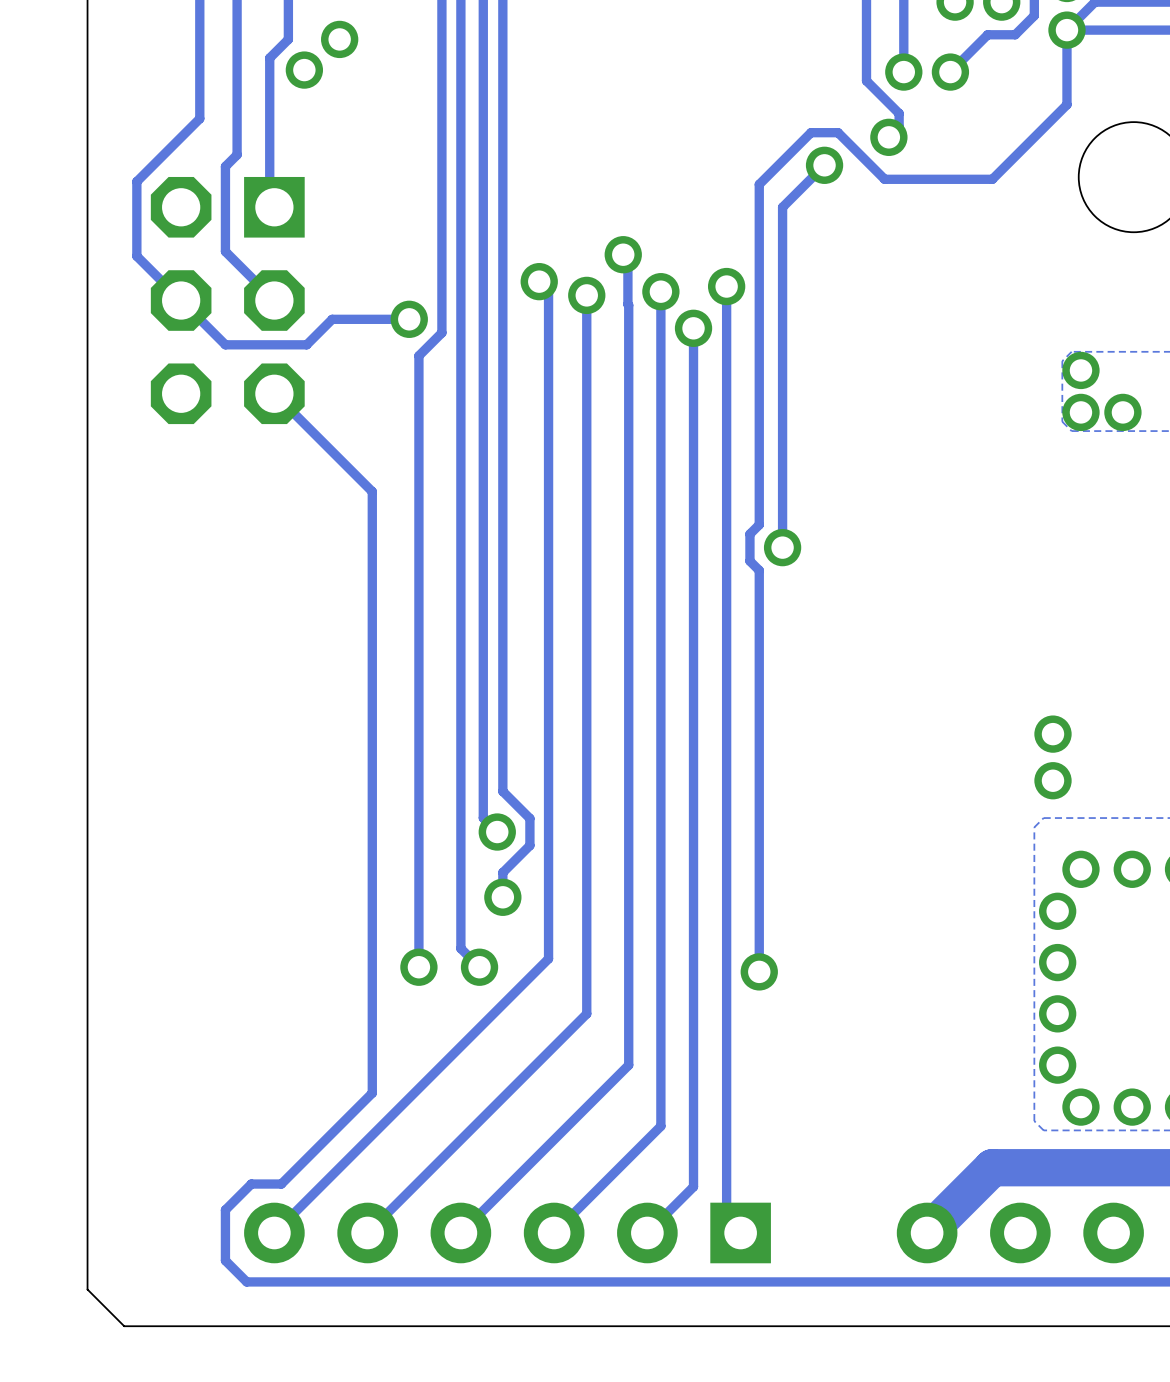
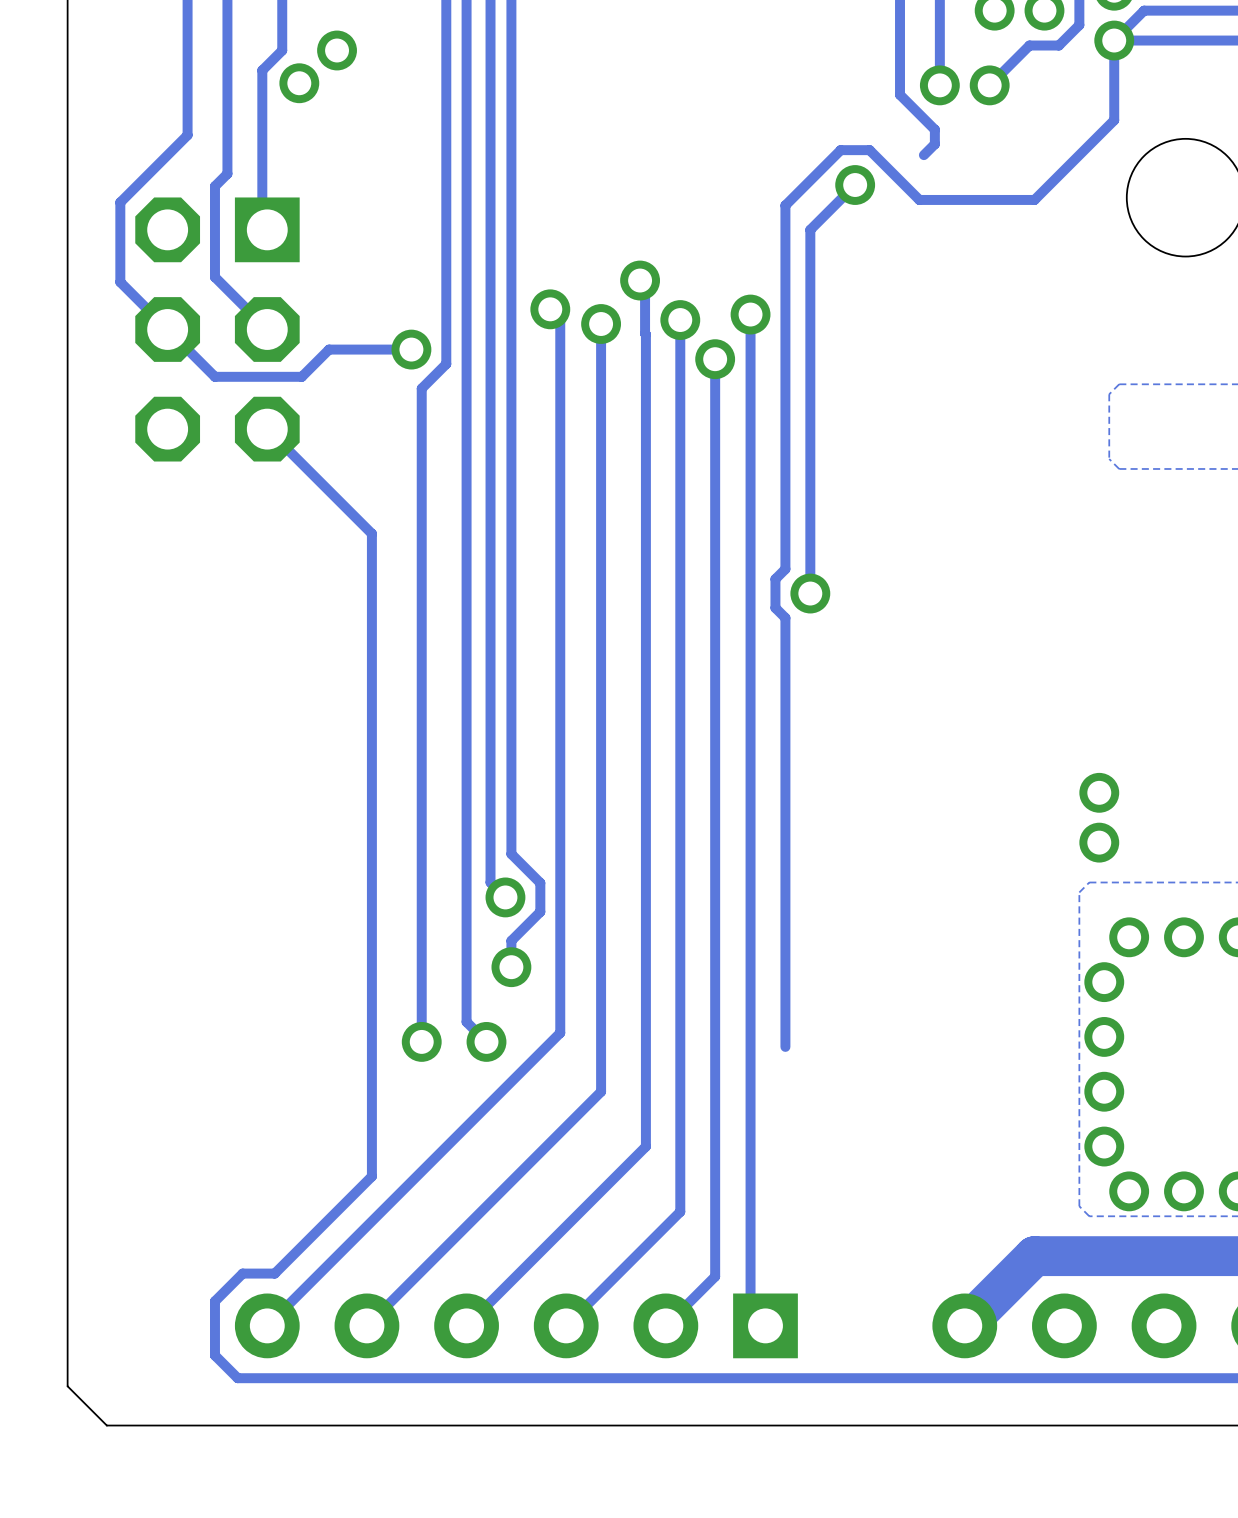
via: (888, 137) -> none
via: (1080, 370) -> none
via: (1080, 412) -> none
via: (1122, 412) -> none
via: (759, 971) -> none

